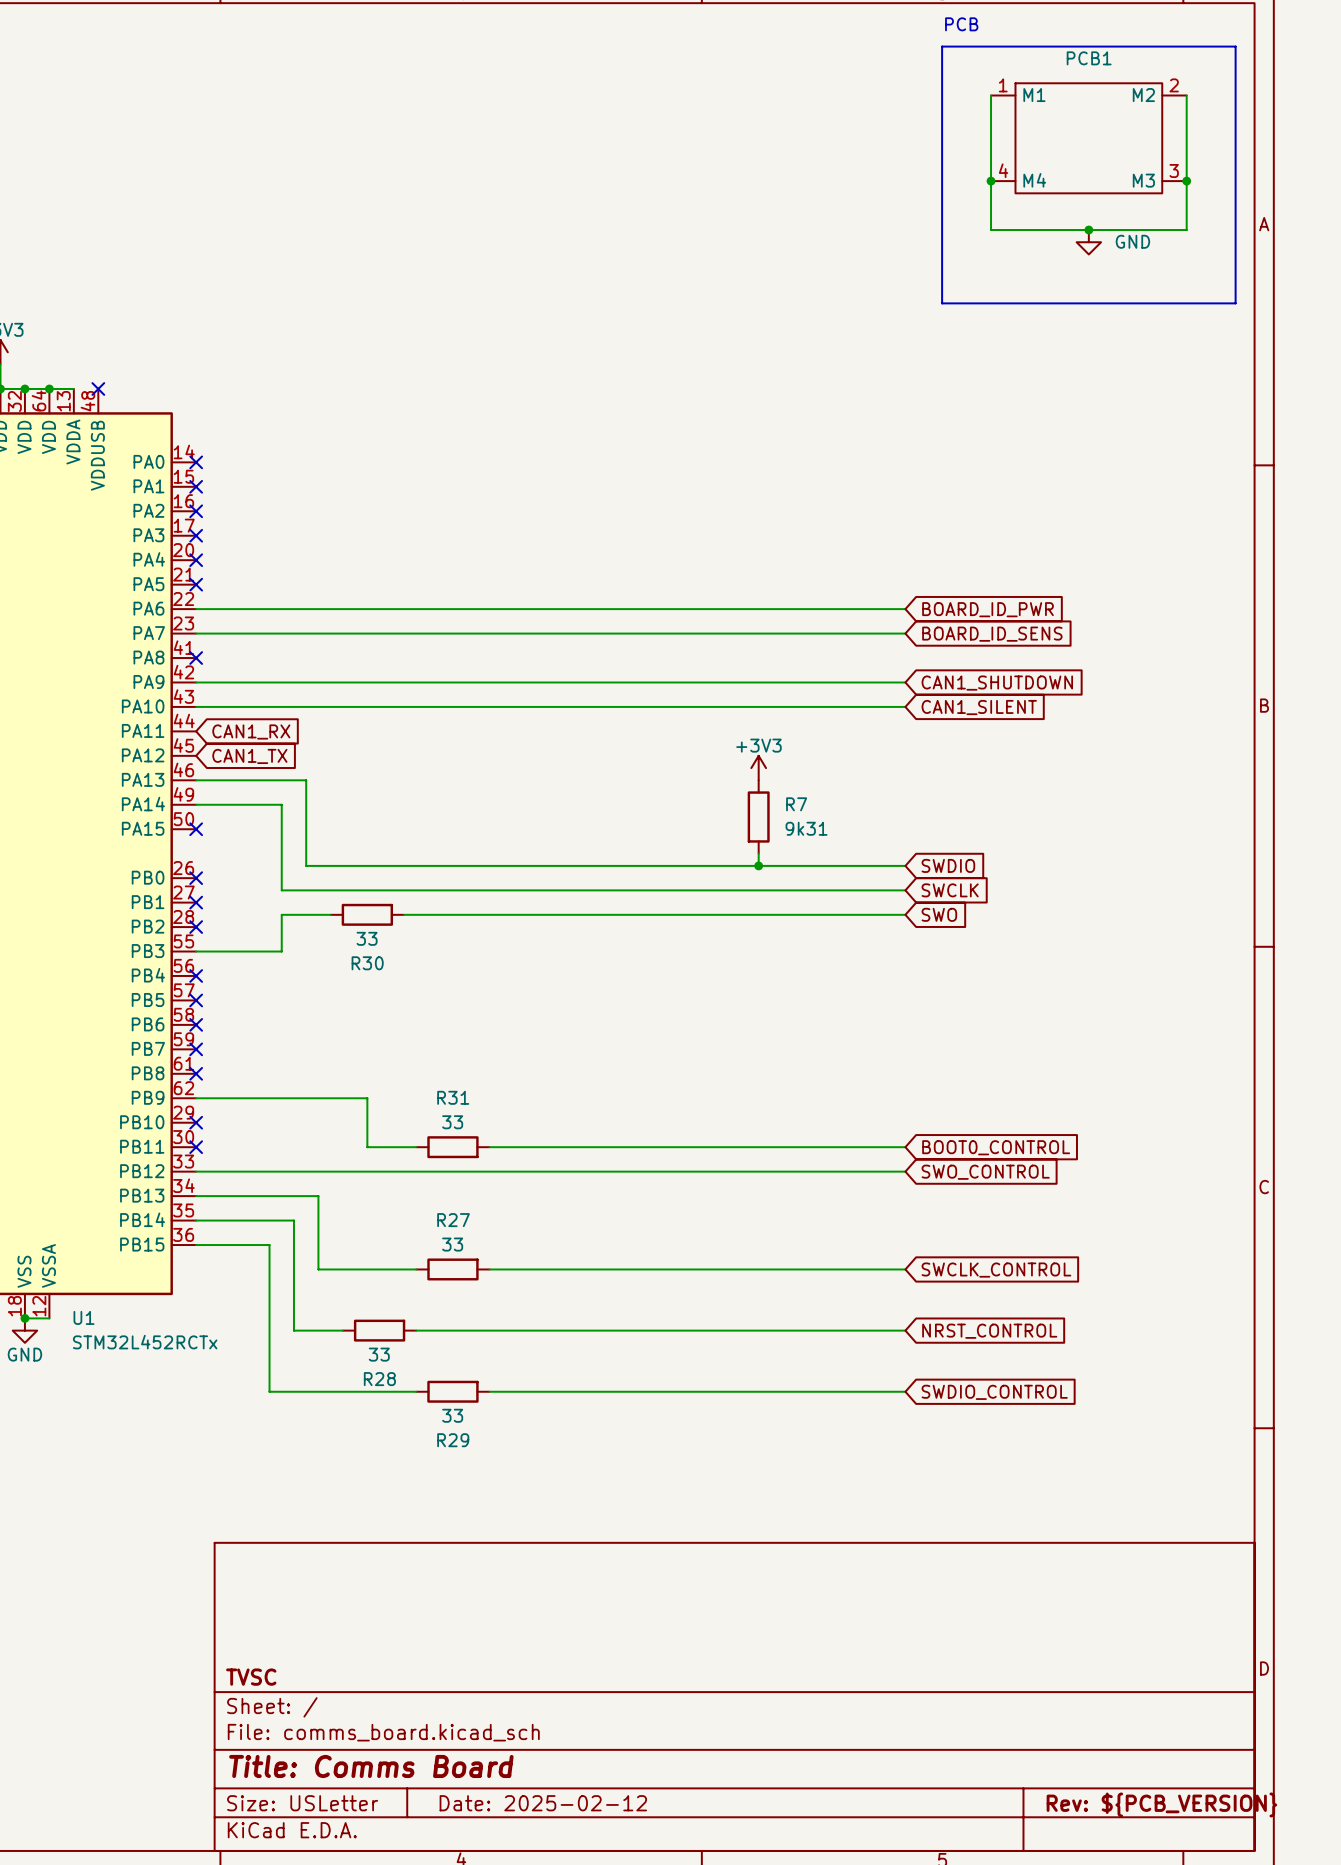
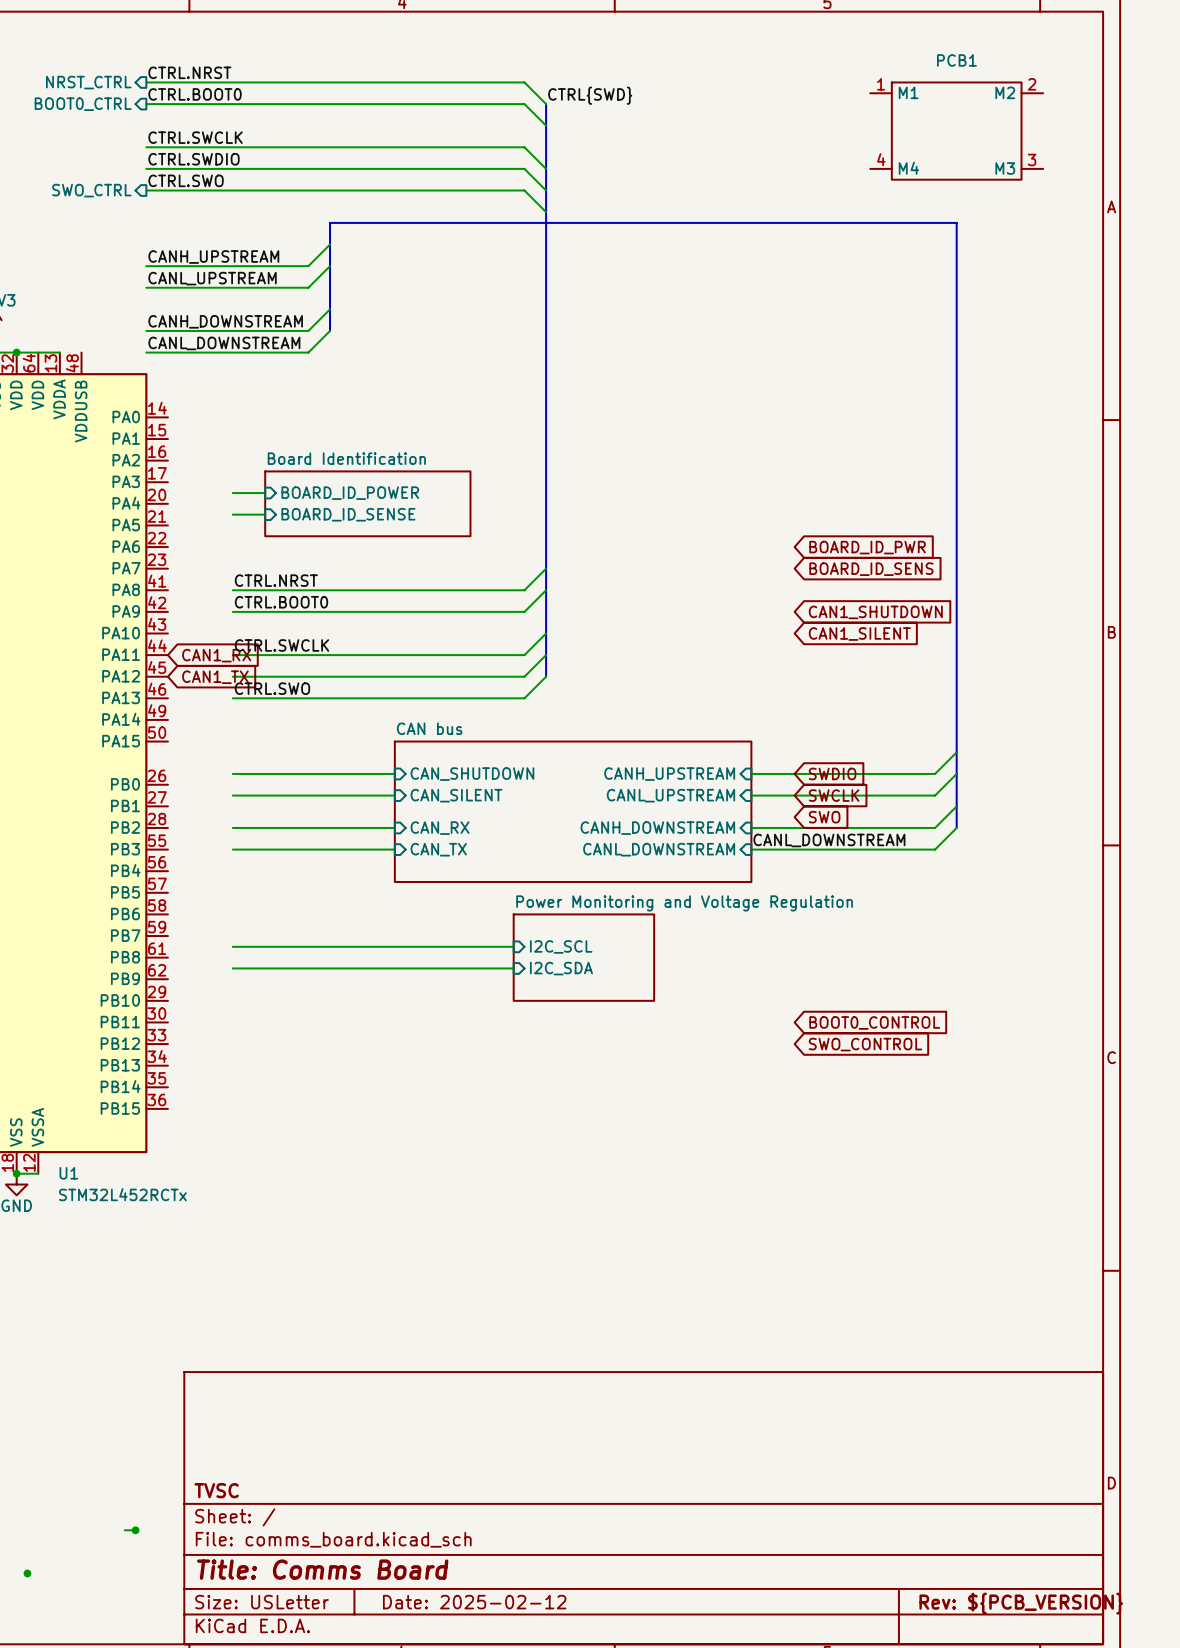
text: PCB (961, 24) -> none
line: (942, 46) (1235, 46) (1235, 303) (942, 303) (942, 46) -> none
label: none -> CTRL.NRST (189, 72)
sheet pin: none -> NRST_CTRL (88, 82)
wire: none -> (146, 82) (524, 82) (546, 104)
wire: (991, 95) (991, 230) (1186, 230) (1186, 95) -> none
label: none -> CTRL.BOOT0 (195, 94)
label: none -> CTRL{SWD} (590, 95)
sheet pin: none -> BOOT0_CTRL (83, 104)
wire: none -> (146, 104) (524, 104) (546, 125)
bus: none -> (546, 104) (546, 676)
label: none -> CTRL.SWCLK (195, 137)
wire: none -> (146, 147) (524, 147) (546, 168)
label: none -> CTRL.SWDIO (194, 159)
wire: none -> (146, 168) (524, 168) (546, 190)
junction: (991, 181) -> none
junction: (1186, 181) -> none
label: none -> CTRL.SWO (186, 180)
sheet pin: none -> SWO_CTRL (91, 190)
wire: none -> (146, 190) (524, 190) (546, 212)
junction: (1088, 230) -> none
power symbol: GND (1088, 242) -> none
wire: none -> (330, 244) (308, 266) (146, 266)
label: none -> CANH_UPSTREAM (213, 257)
wire: none -> (330, 266) (308, 287) (146, 287)
label: none -> CANL_UPSTREAM (212, 278)
wire: none -> (330, 309) (308, 330) (146, 330)
label: none -> CANH_DOWNSTREAM (225, 321)
wire: none -> (330, 330) (308, 352) (146, 352)
bus: none -> (330, 330) (330, 222) (956, 222) (956, 827)
label: none -> CANL_DOWNSTREAM (224, 343)
junction: (49, 388) -> none
no-connect mark: (98, 388) -> none
no-connect mark: (196, 462) -> none
no-connect mark: (196, 486) -> none
no-connect mark: (196, 511) -> none
no-connect mark: (196, 535) -> none
wire: none -> (232, 493) (265, 493)
sheet pin: none -> BOARD_ID_POWER (350, 493)
no-connect mark: (196, 560) -> none
sheet Board Identification: none -> (367, 503)
wire: none -> (232, 514) (265, 514)
sheet pin: none -> BOARD_ID_SENSE (348, 514)
no-connect mark: (196, 584) -> none
wire: (196, 609) (905, 609) -> none
wire: (196, 633) (905, 633) -> none
wire: none -> (546, 568) (524, 590) (232, 590)
label: none -> CTRL.NRST (276, 580)
no-connect mark: (196, 658) -> none
label: none -> CTRL.BOOT0 (281, 602)
wire: (196, 682) (269, 682) -> none
wire: (599, 682) (905, 682) -> (524, 611) (546, 590)
wire: (196, 706) (905, 706) -> none
wire: none -> (546, 633) (524, 655) (232, 655)
label: none -> CTRL.SWCLK (281, 645)
wire: none -> (546, 655) (524, 676) (232, 676)
wire: none -> (546, 676) (524, 698) (265, 698)
power symbol: +3V3 (758, 768) -> none
label: none -> CTRL.SWO (272, 688)
wire: (196, 780) (269, 780) -> none
wire: (306, 780) (306, 865) -> (232, 773) (265, 773)
wire: (196, 804) (281, 804) (281, 890) -> (232, 795) (243, 795)
R7: 9k31 (758, 817) -> none
no-connect mark: (196, 829) -> none
wire: none -> (956, 752) (935, 773) (794, 773)
wire: (758, 853) (758, 865) -> none
wire: (452, 865) (856, 865) -> none
junction: (758, 865) -> none
wire: none -> (956, 773) (935, 795) (794, 795)
sheet pin: none -> CAN_SHUTDOWN (472, 774)
sheet pin: none -> CANH_UPSTREAM (669, 774)
no-connect mark: (196, 878) -> none
wire: (452, 890) (856, 890) -> none
sheet pin: none -> CAN_SILENT (456, 795)
sheet pin: none -> CANL_UPSTREAM (670, 795)
no-connect mark: (196, 902) -> none
wire: none -> (956, 806) (935, 827) (751, 827)
sheet CAN bus: none -> (573, 811)
wire: (330, 914) (281, 914) (281, 951) -> (394, 849) (243, 849)
R30: 33 (367, 914) -> none
wire: (404, 914) (905, 914) -> none
no-connect mark: (196, 927) -> none
wire: none -> (232, 827) (394, 827)
sheet pin: none -> CAN_RX (440, 828)
sheet pin: none -> CANH_DOWNSTREAM (657, 828)
wire: none -> (956, 827) (935, 849) (751, 849)
label: none -> CANL_DOWNSTREAM (829, 840)
wire: (196, 951) (269, 951) -> none
sheet pin: none -> CAN_TX (438, 849)
sheet pin: none -> CANL_DOWNSTREAM (659, 849)
no-connect mark: (196, 975) -> none
no-connect mark: (196, 1000) -> none
no-connect mark: (196, 1024) -> none
no-connect mark: (196, 1049) -> none
wire: none -> (232, 946) (513, 946)
sheet pin: none -> I2C_SCL (561, 946)
no-connect mark: (196, 1073) -> none
sheet Power Monitoring and Voltage Regulation: none -> (583, 957)
wire: none -> (232, 968) (513, 968)
sheet pin: none -> I2C_SDA (561, 968)
wire: (196, 1098) (367, 1098) (367, 1147) (416, 1147) -> none
no-connect mark: (196, 1122) -> none
no-connect mark: (196, 1147) -> none
R31: 33 (452, 1147) -> none
wire: (489, 1147) (905, 1147) -> none
wire: (196, 1171) (905, 1171) -> none
wire: (196, 1196) (318, 1196) (318, 1269) (416, 1269) -> none
wire: (196, 1220) (293, 1220) (293, 1330) (342, 1330) -> none
wire: (196, 1245) (269, 1245) (269, 1391) (416, 1391) -> none
R27: 33 (452, 1269) -> none
wire: (489, 1269) (905, 1269) -> none
global label: SWCLK_CONTROL (996, 1270) -> none
R28: 33 (379, 1330) -> none
wire: (416, 1330) (905, 1330) -> none
global label: NRST_CONTROL (989, 1331) -> none
R29: 33 (452, 1391) -> none
wire: (489, 1391) (905, 1391) -> none
global label: SWDIO_CONTROL (994, 1392) -> none
wire: none -> (124, 1530) (135, 1530)
junction: none -> (135, 1530)
junction: none -> (27, 1573)

